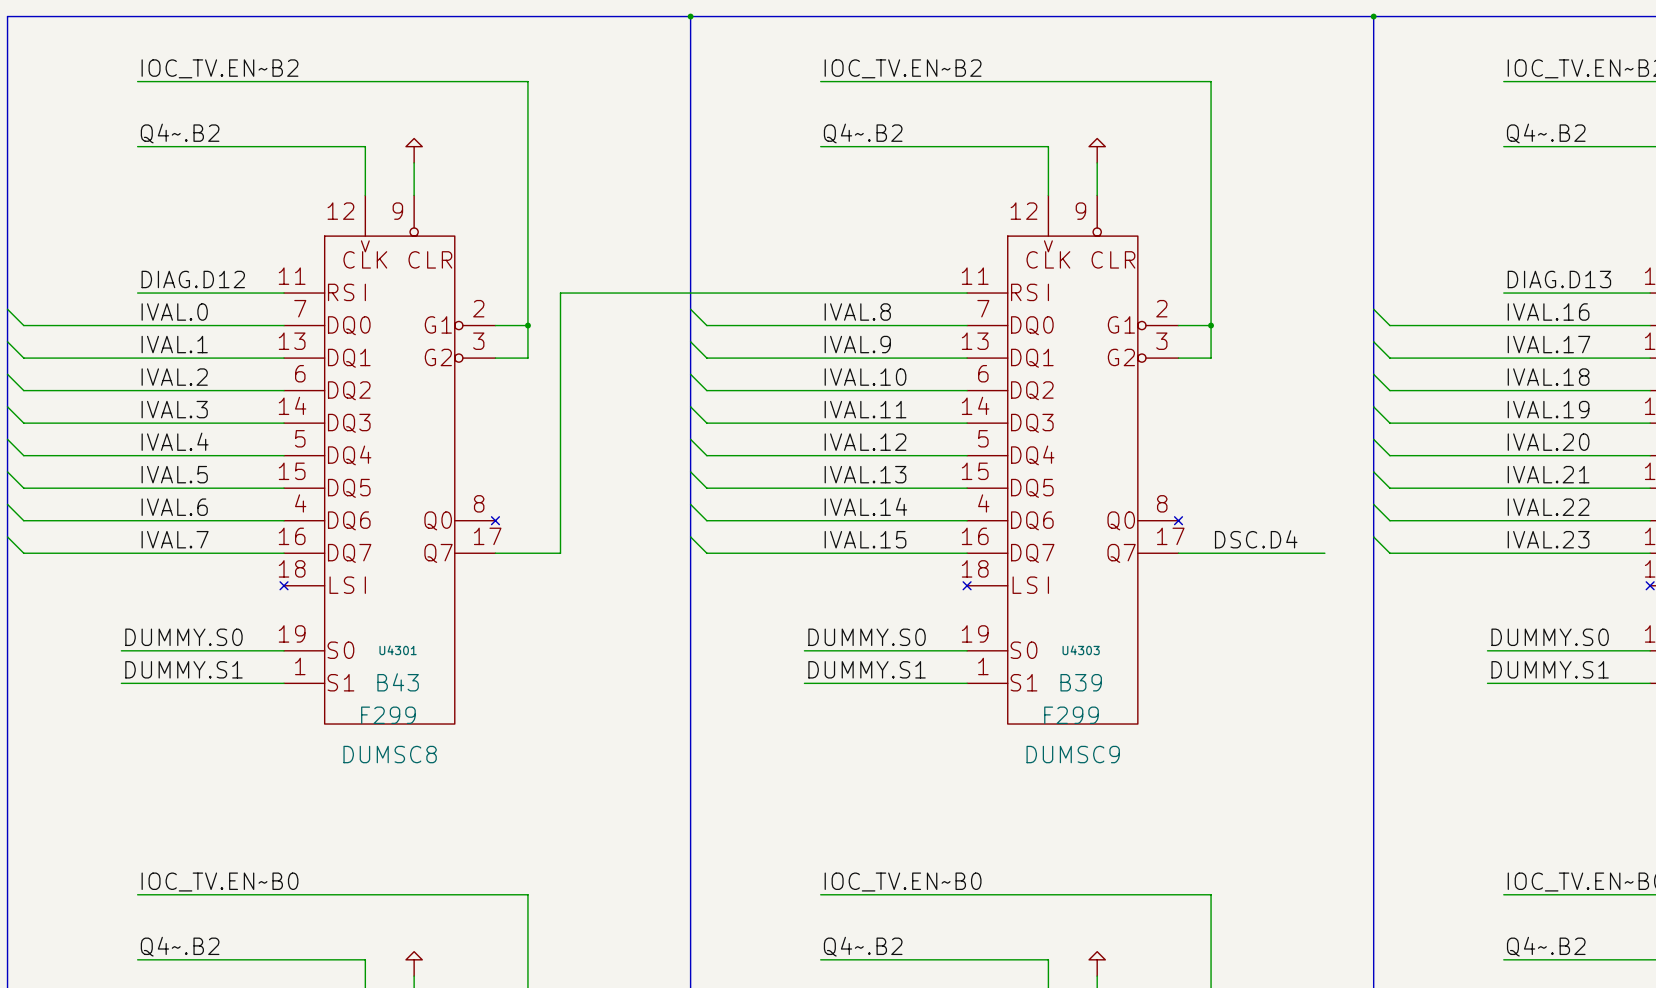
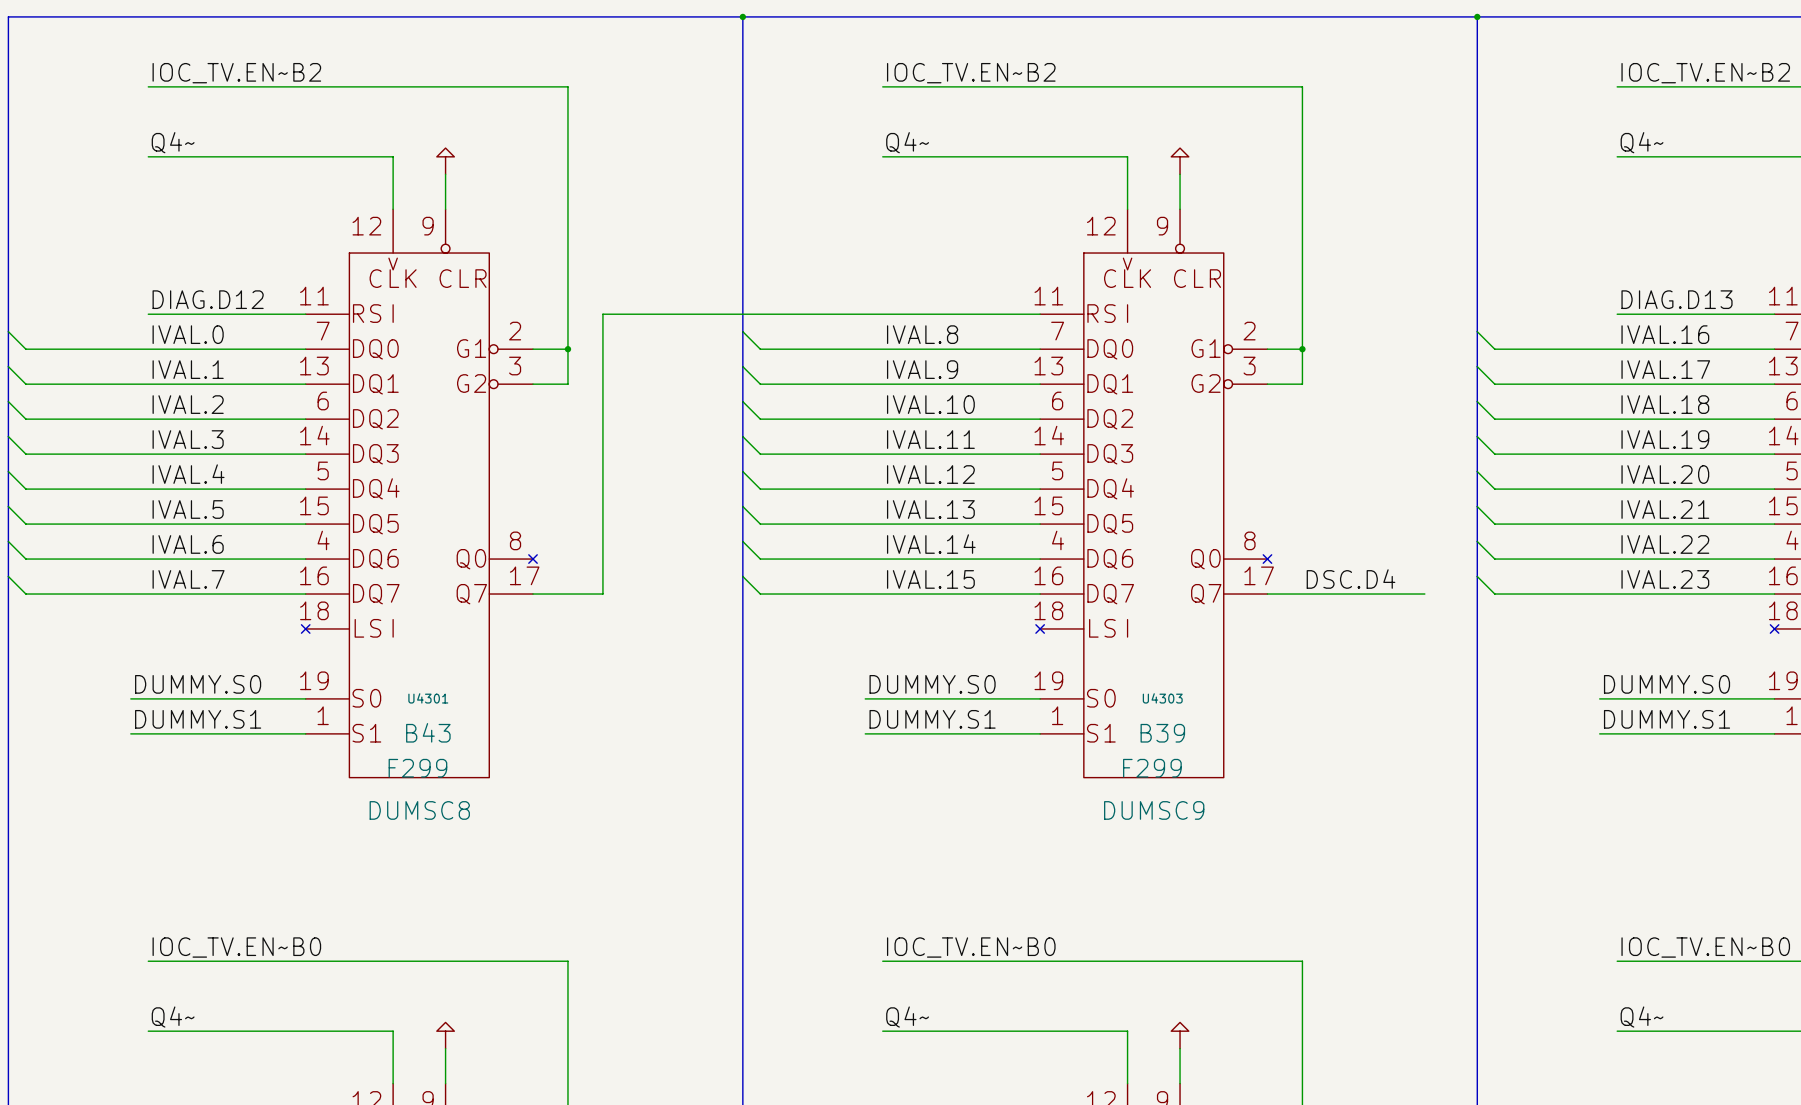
label: Q4~.B2 (180, 133) -> Q4~ (173, 142)
label: Q4~.B2 (863, 133) -> Q4~ (907, 142)
label: Q4~.B2 (1546, 133) -> Q4~ (1642, 142)
label: Q4~.B2 (180, 946) -> Q4~ (173, 1017)
label: Q4~.B2 (863, 946) -> Q4~ (907, 1017)
label: Q4~.B2 (1546, 946) -> Q4~ (1642, 1017)

